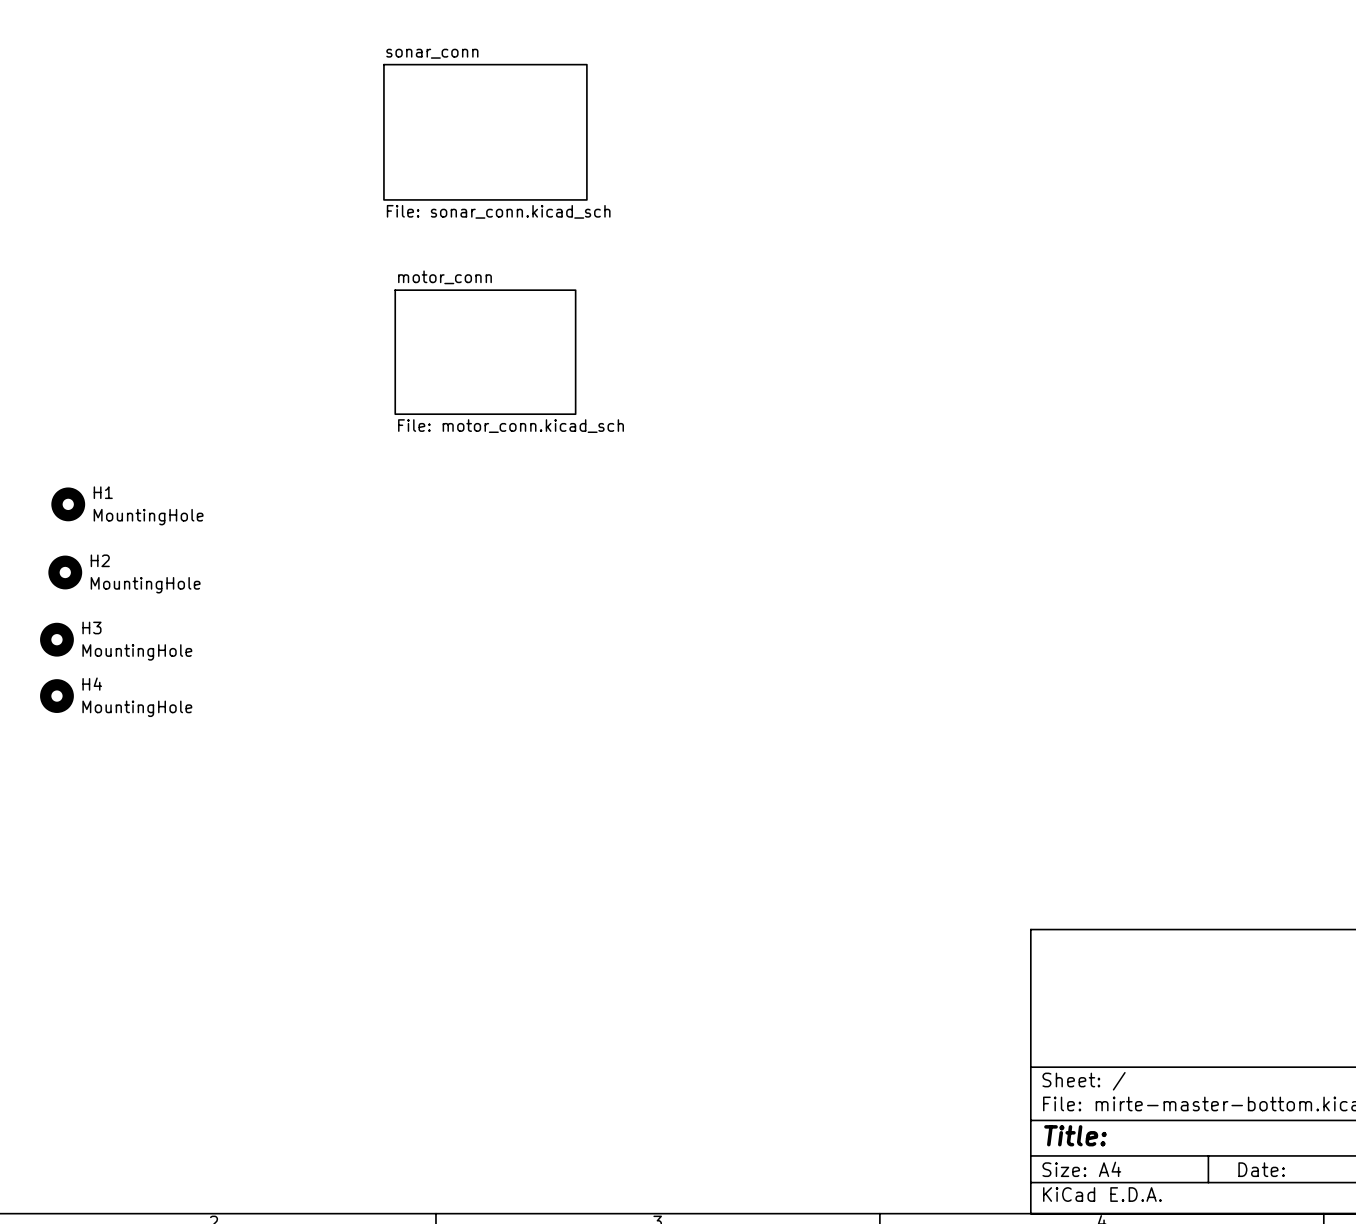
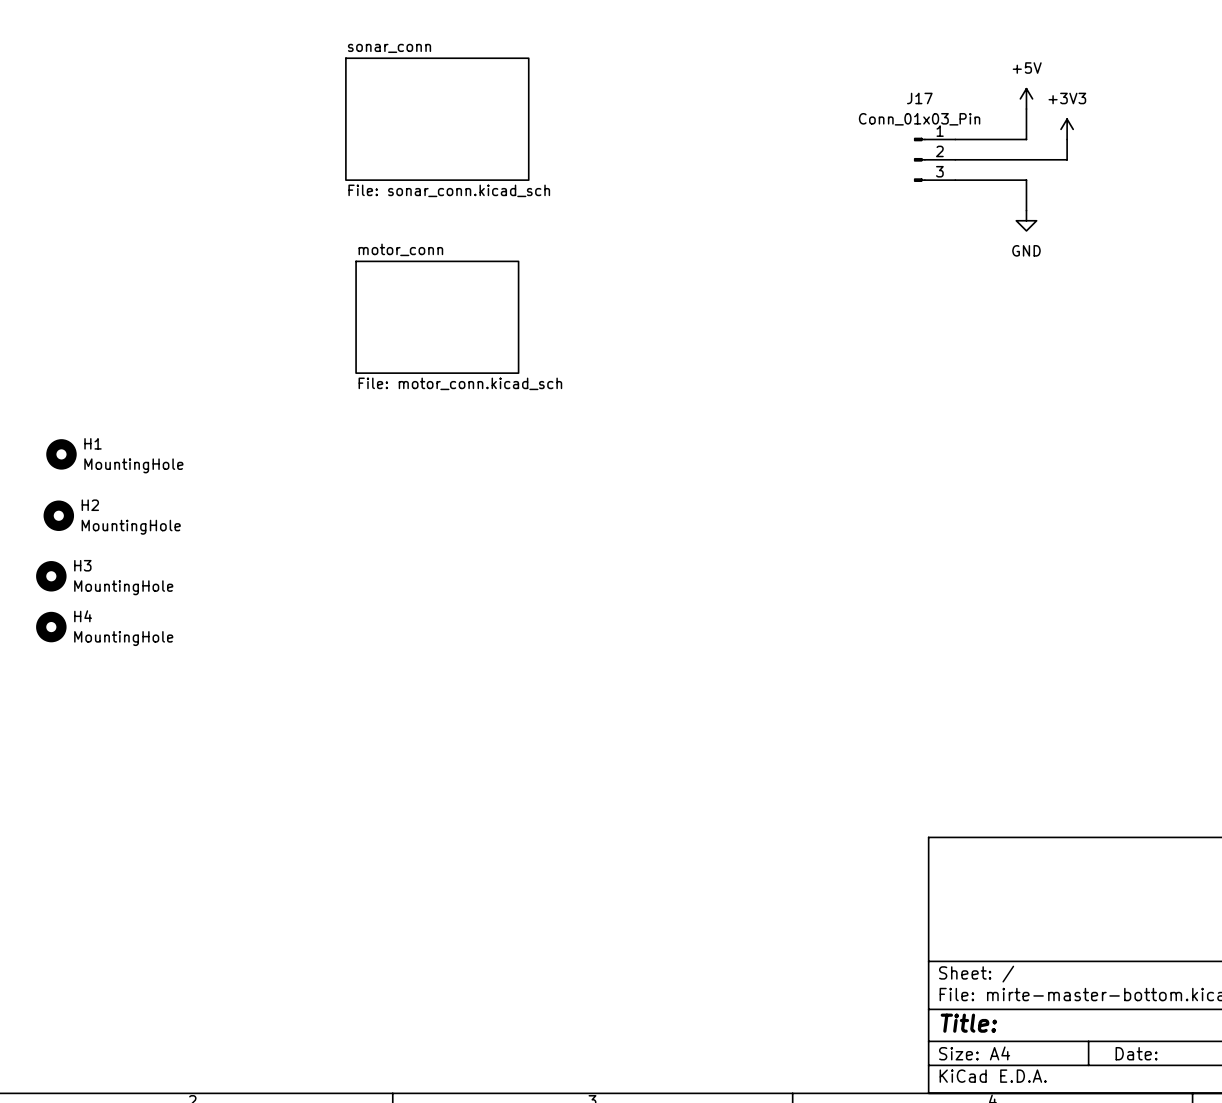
power symbol: none -> +5V (1026, 98)
wire: none -> (1026, 109) (1026, 139) (955, 139)
power symbol: none -> +3V3 (1067, 129)
wire: none -> (1067, 139) (1067, 159) (955, 159)
J17: none -> Conn_01x03_Pin (934, 159)
wire: none -> (955, 180) (1026, 180) (1026, 210)
power symbol: none -> GND (1026, 220)

